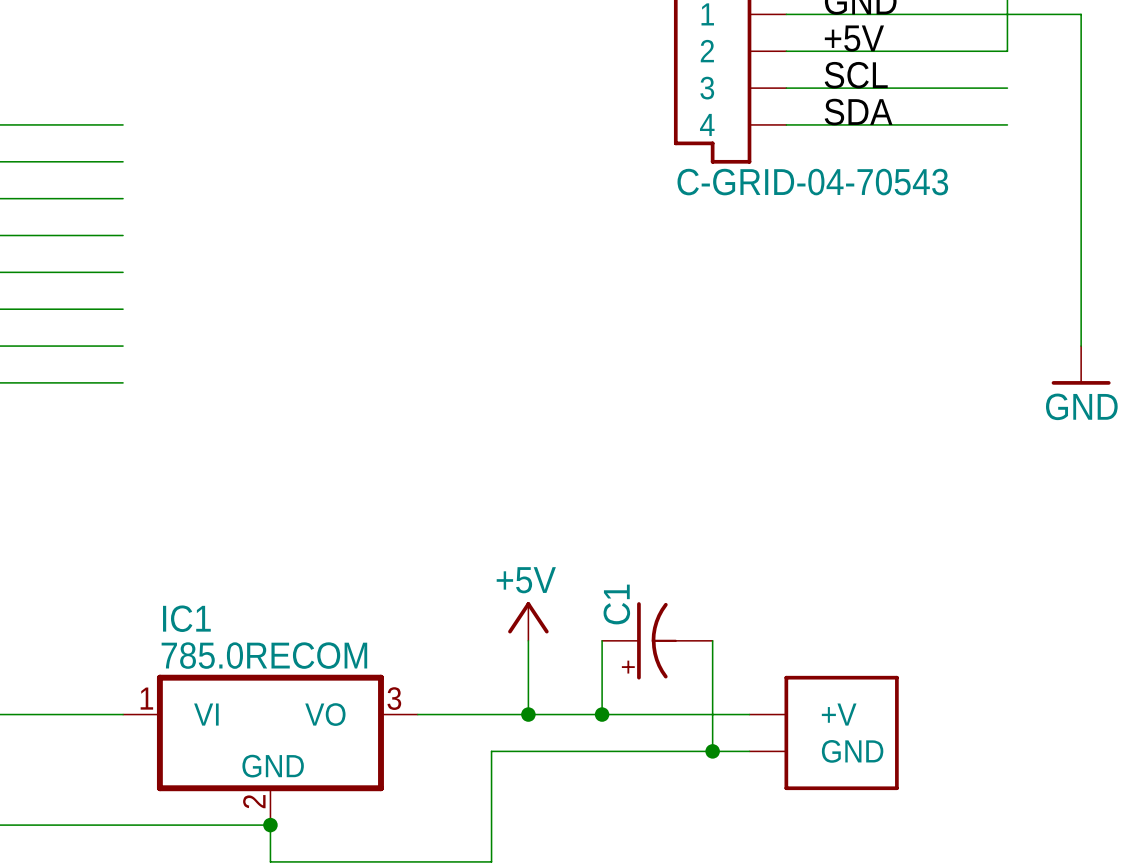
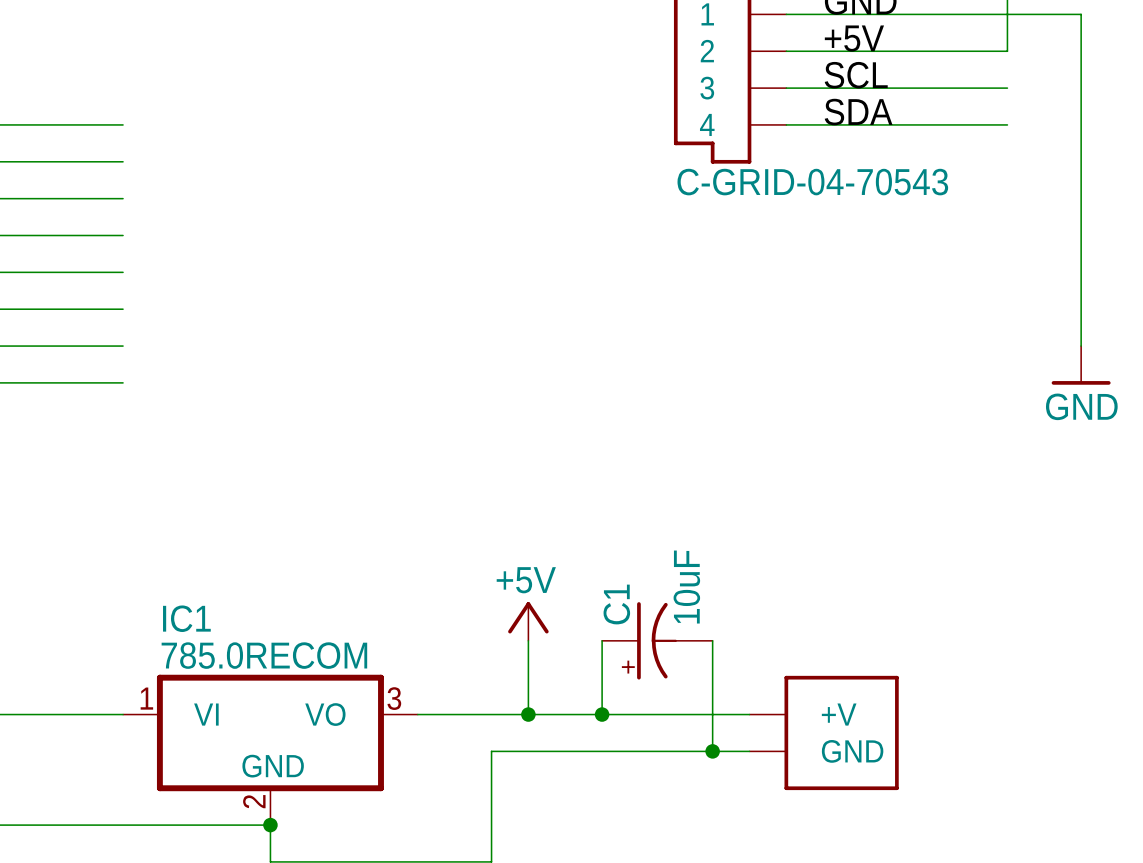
C1 value: none -> 10uF (686, 587)

